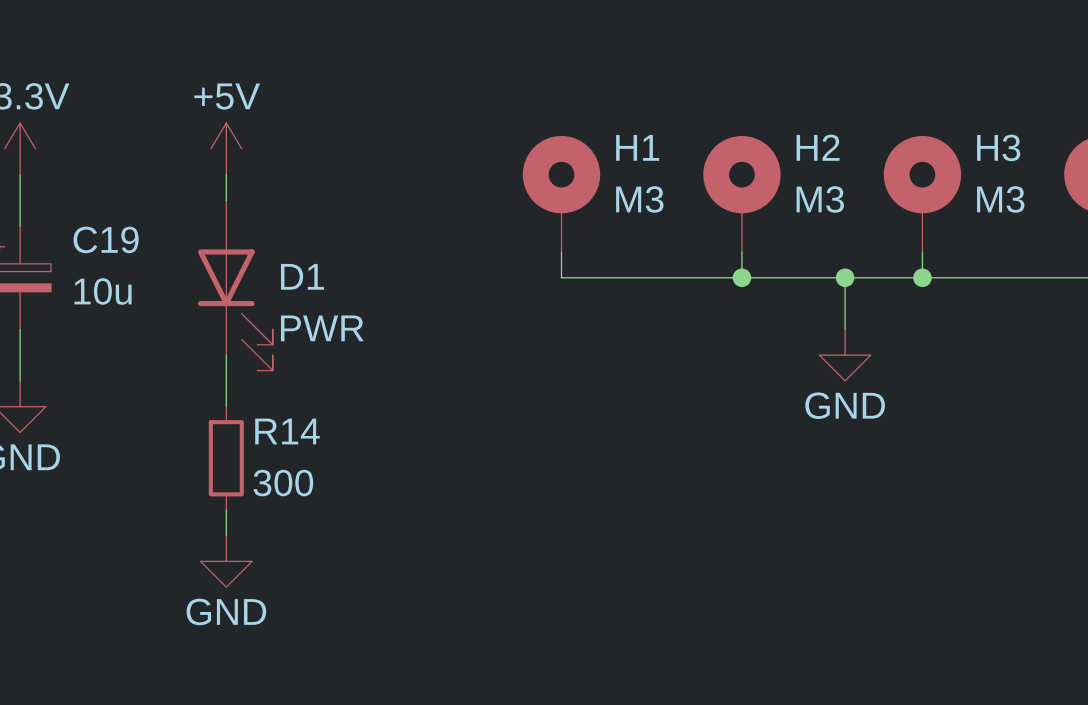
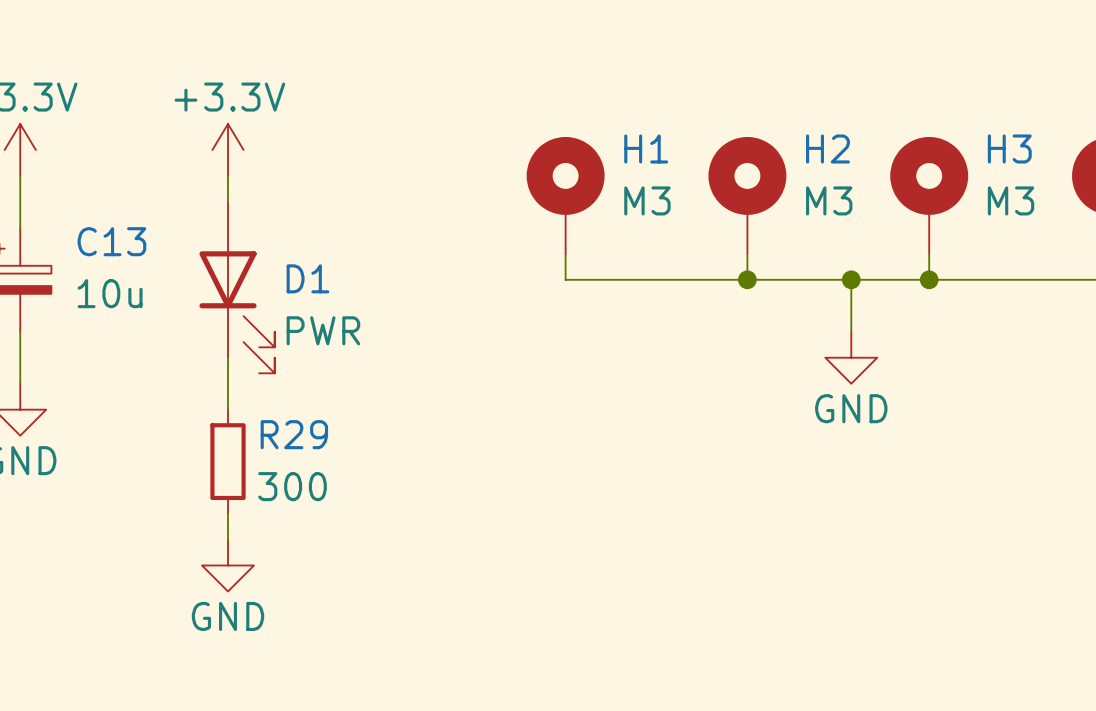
power symbol: +5V (226, 148) -> +3.3V (228, 149)
C19 name: C19 (106, 239) -> C13 (111, 241)
R14 name: R14 (287, 431) -> R29 (294, 434)

